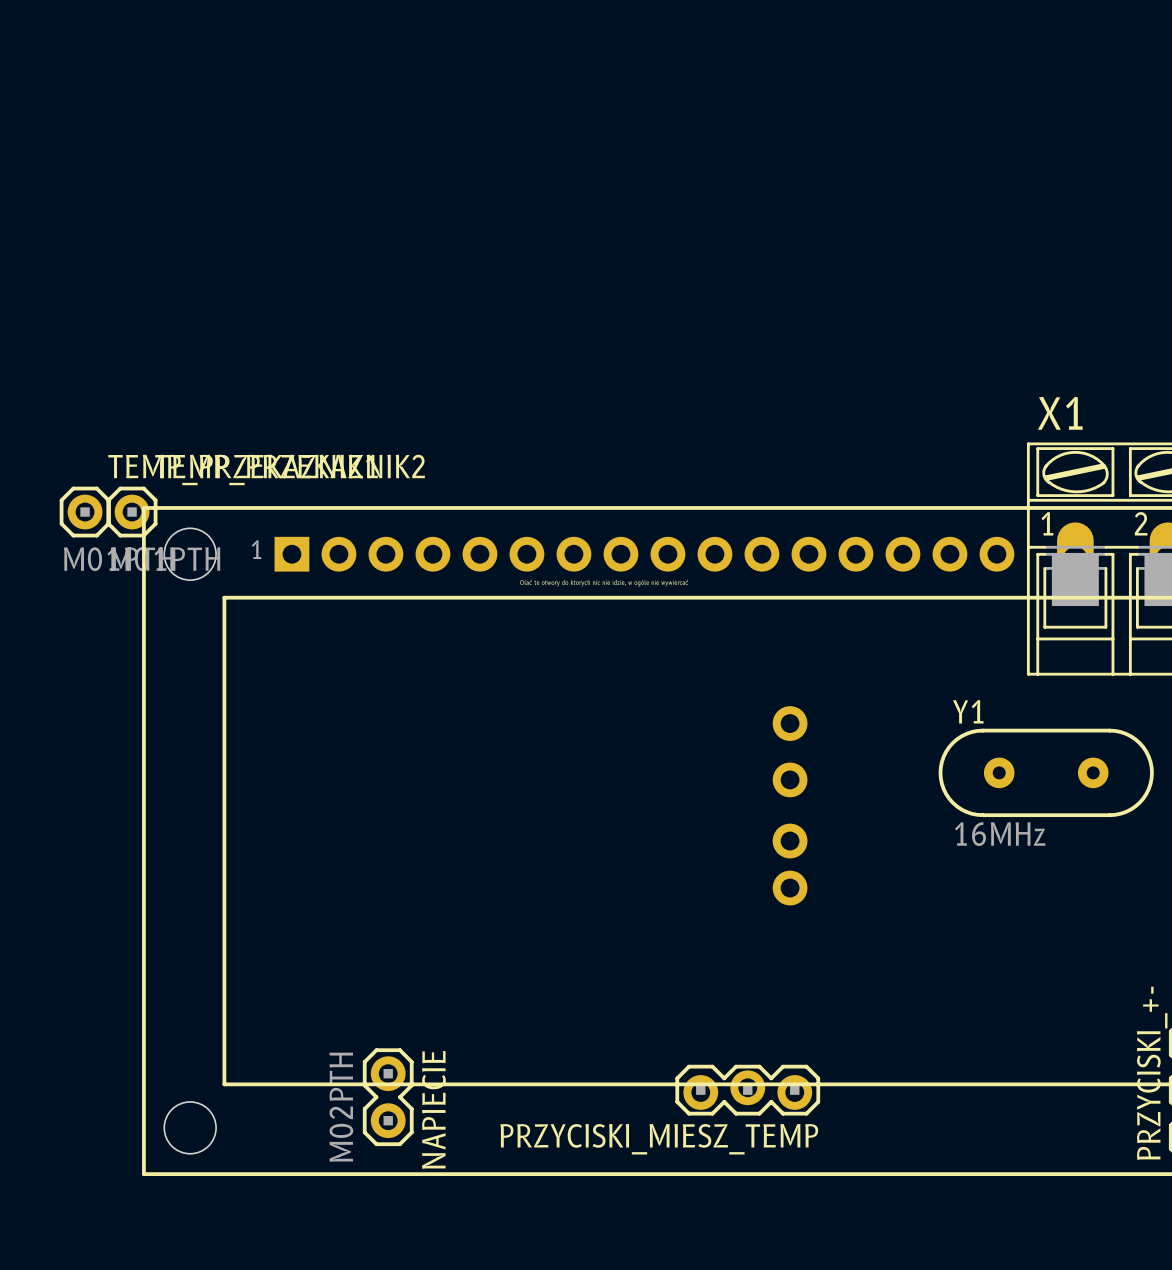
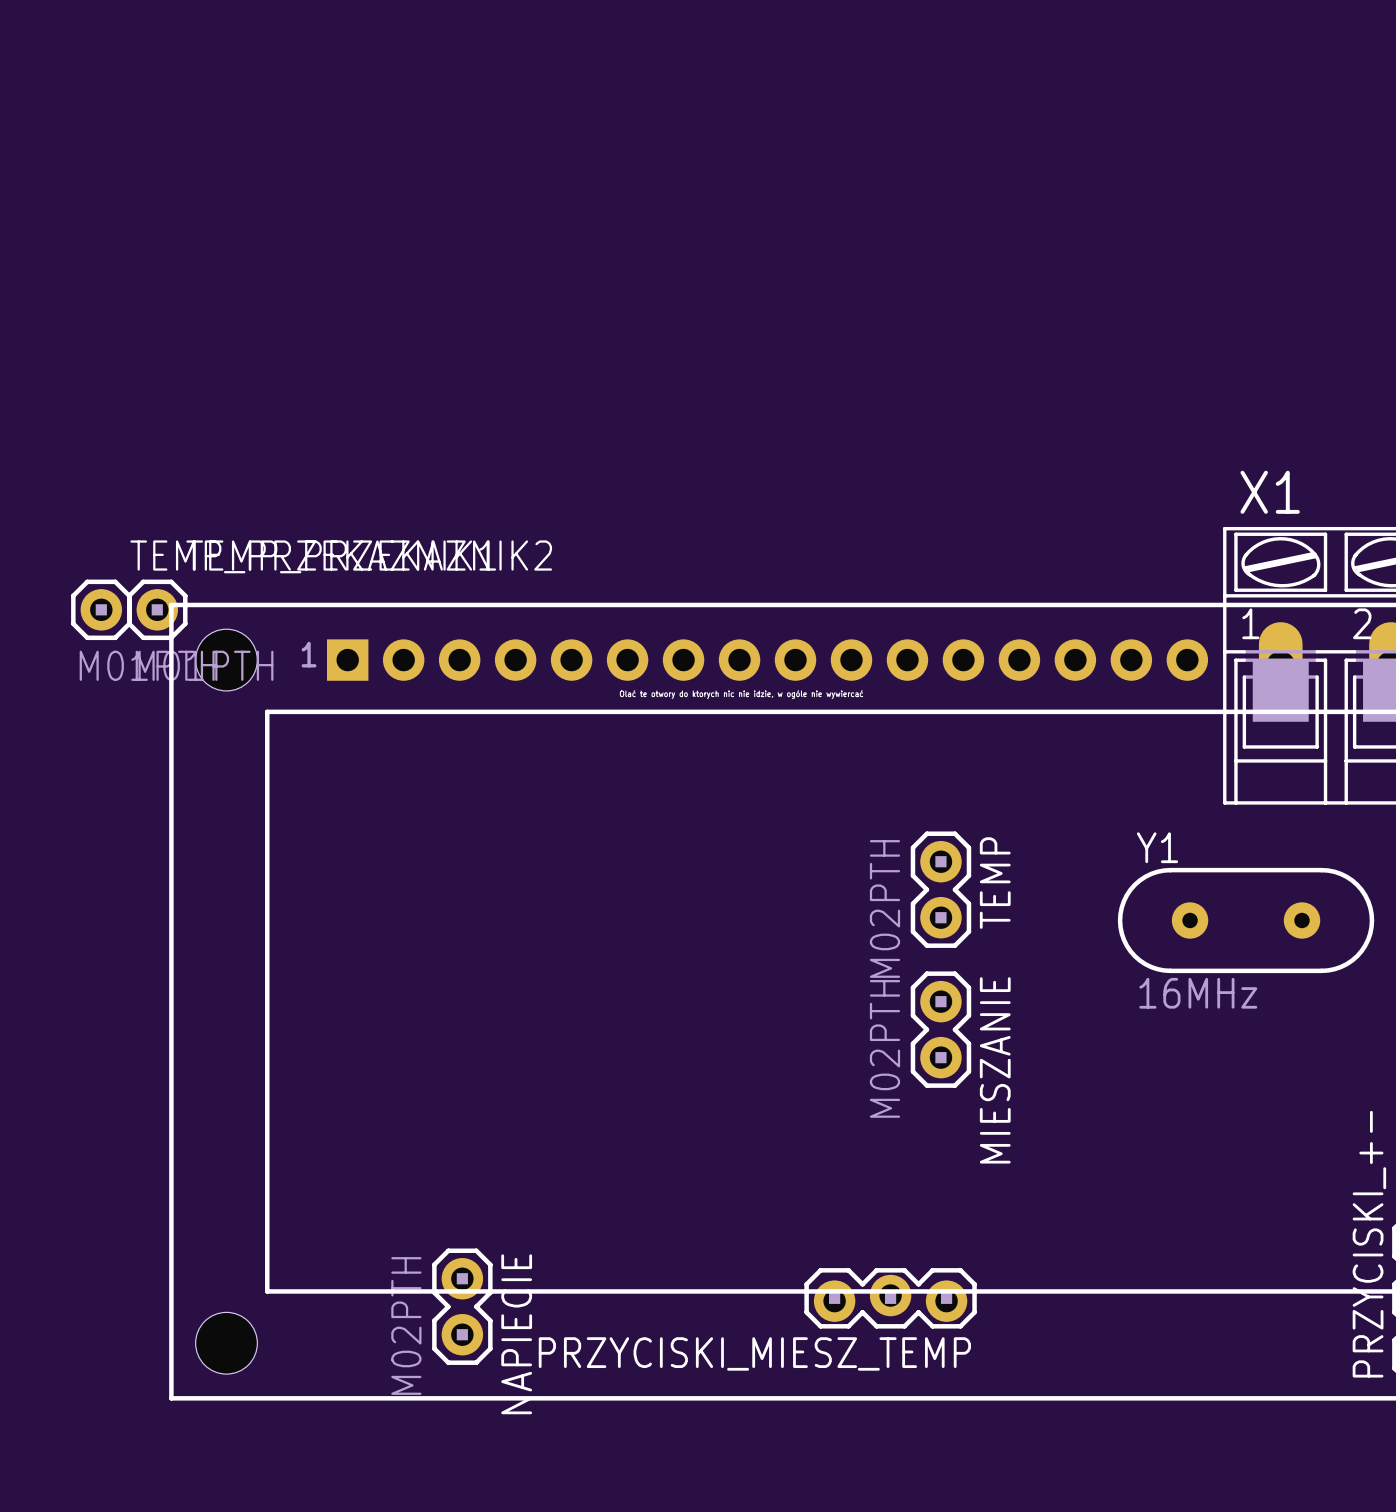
part: (790, 723) -> none
TEMP: none -> M02PTH (940, 889)
part: (790, 779) -> none
part: (790, 841) -> none
MIESZANIE: none -> M02PTH (940, 1029)
part: (790, 888) -> none

